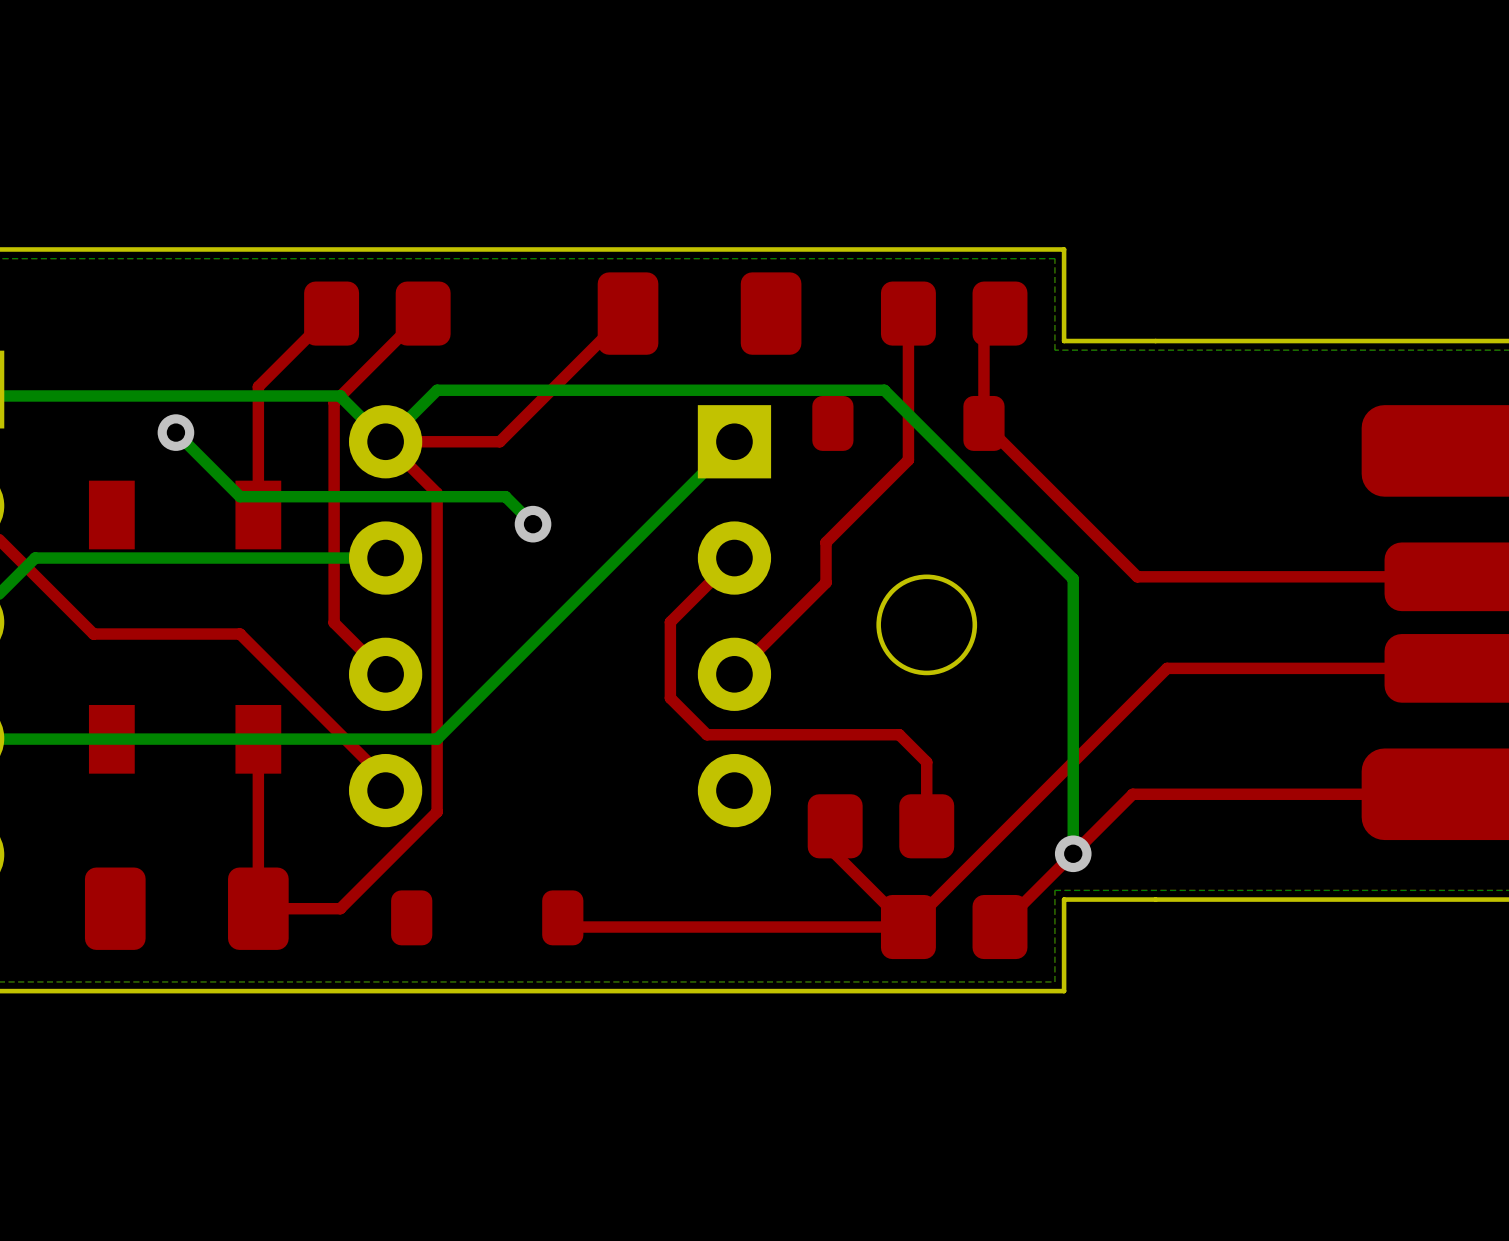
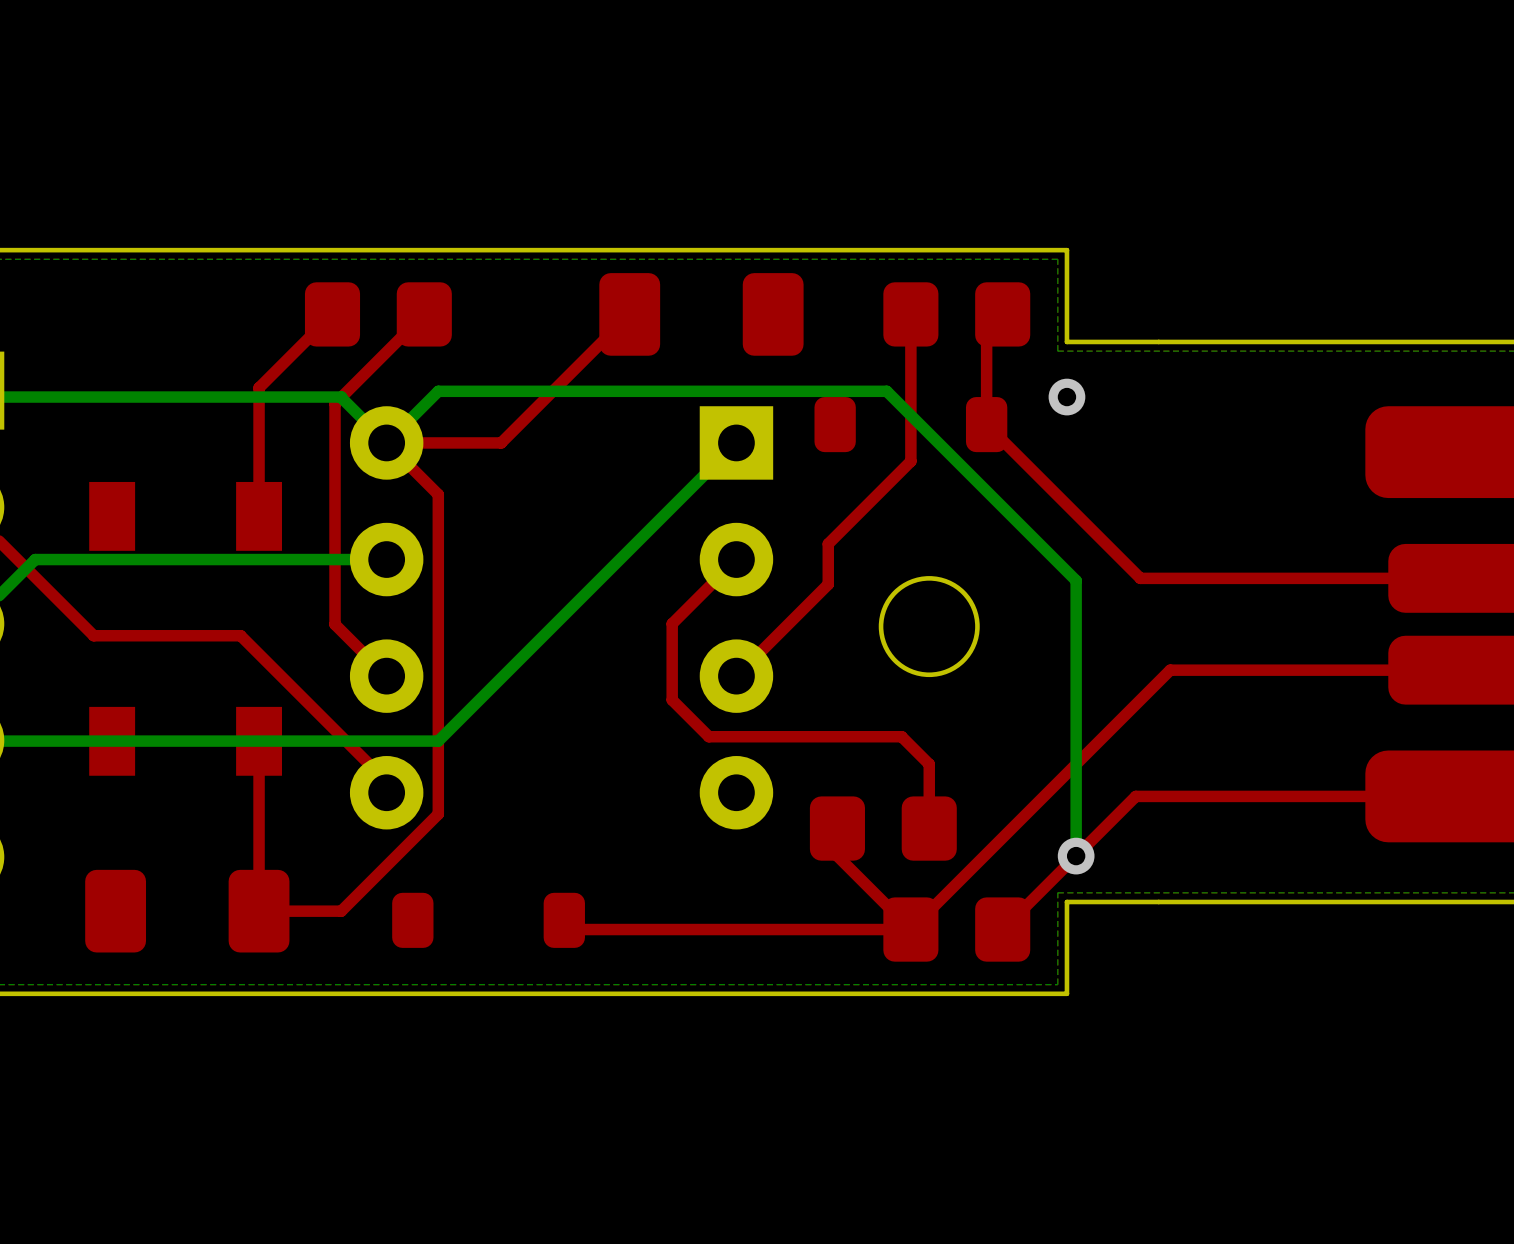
via: none -> (1066, 397)
bottom track: (175, 432) (240, 496) (505, 496) (533, 524) -> none
via: (175, 432) -> none
via: (533, 524) -> none

